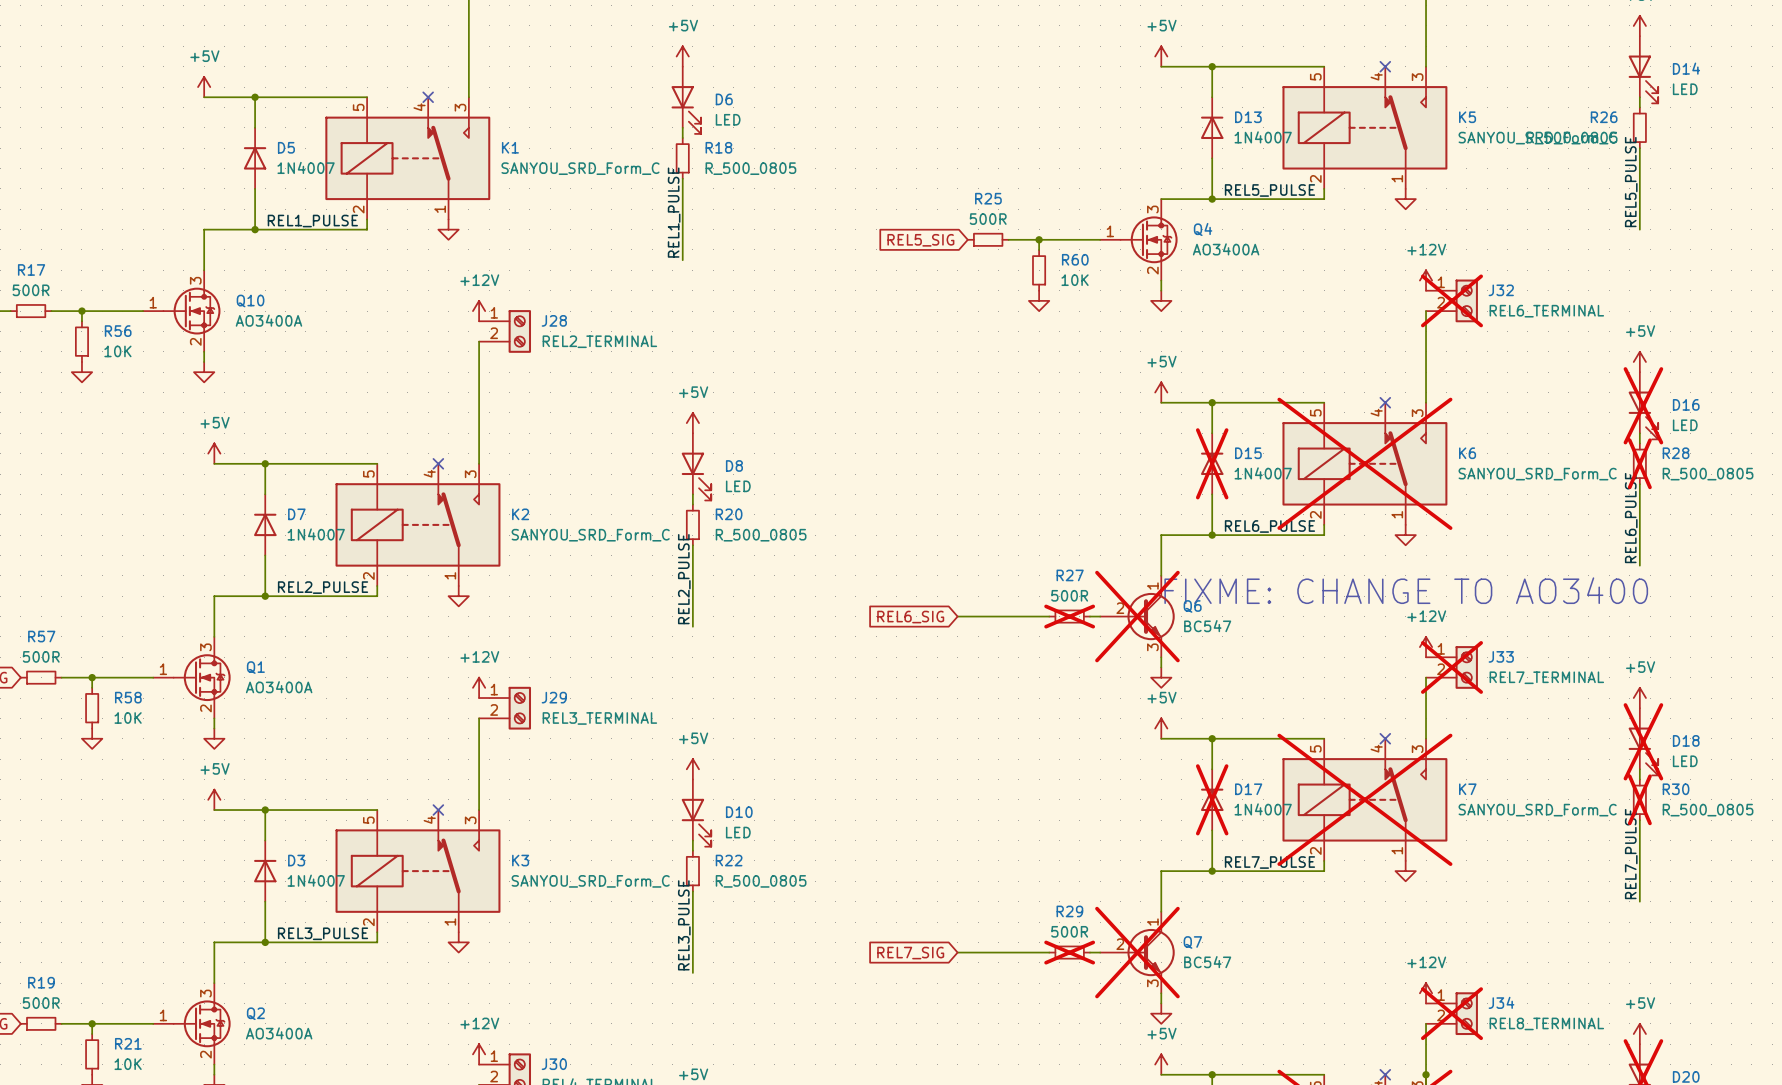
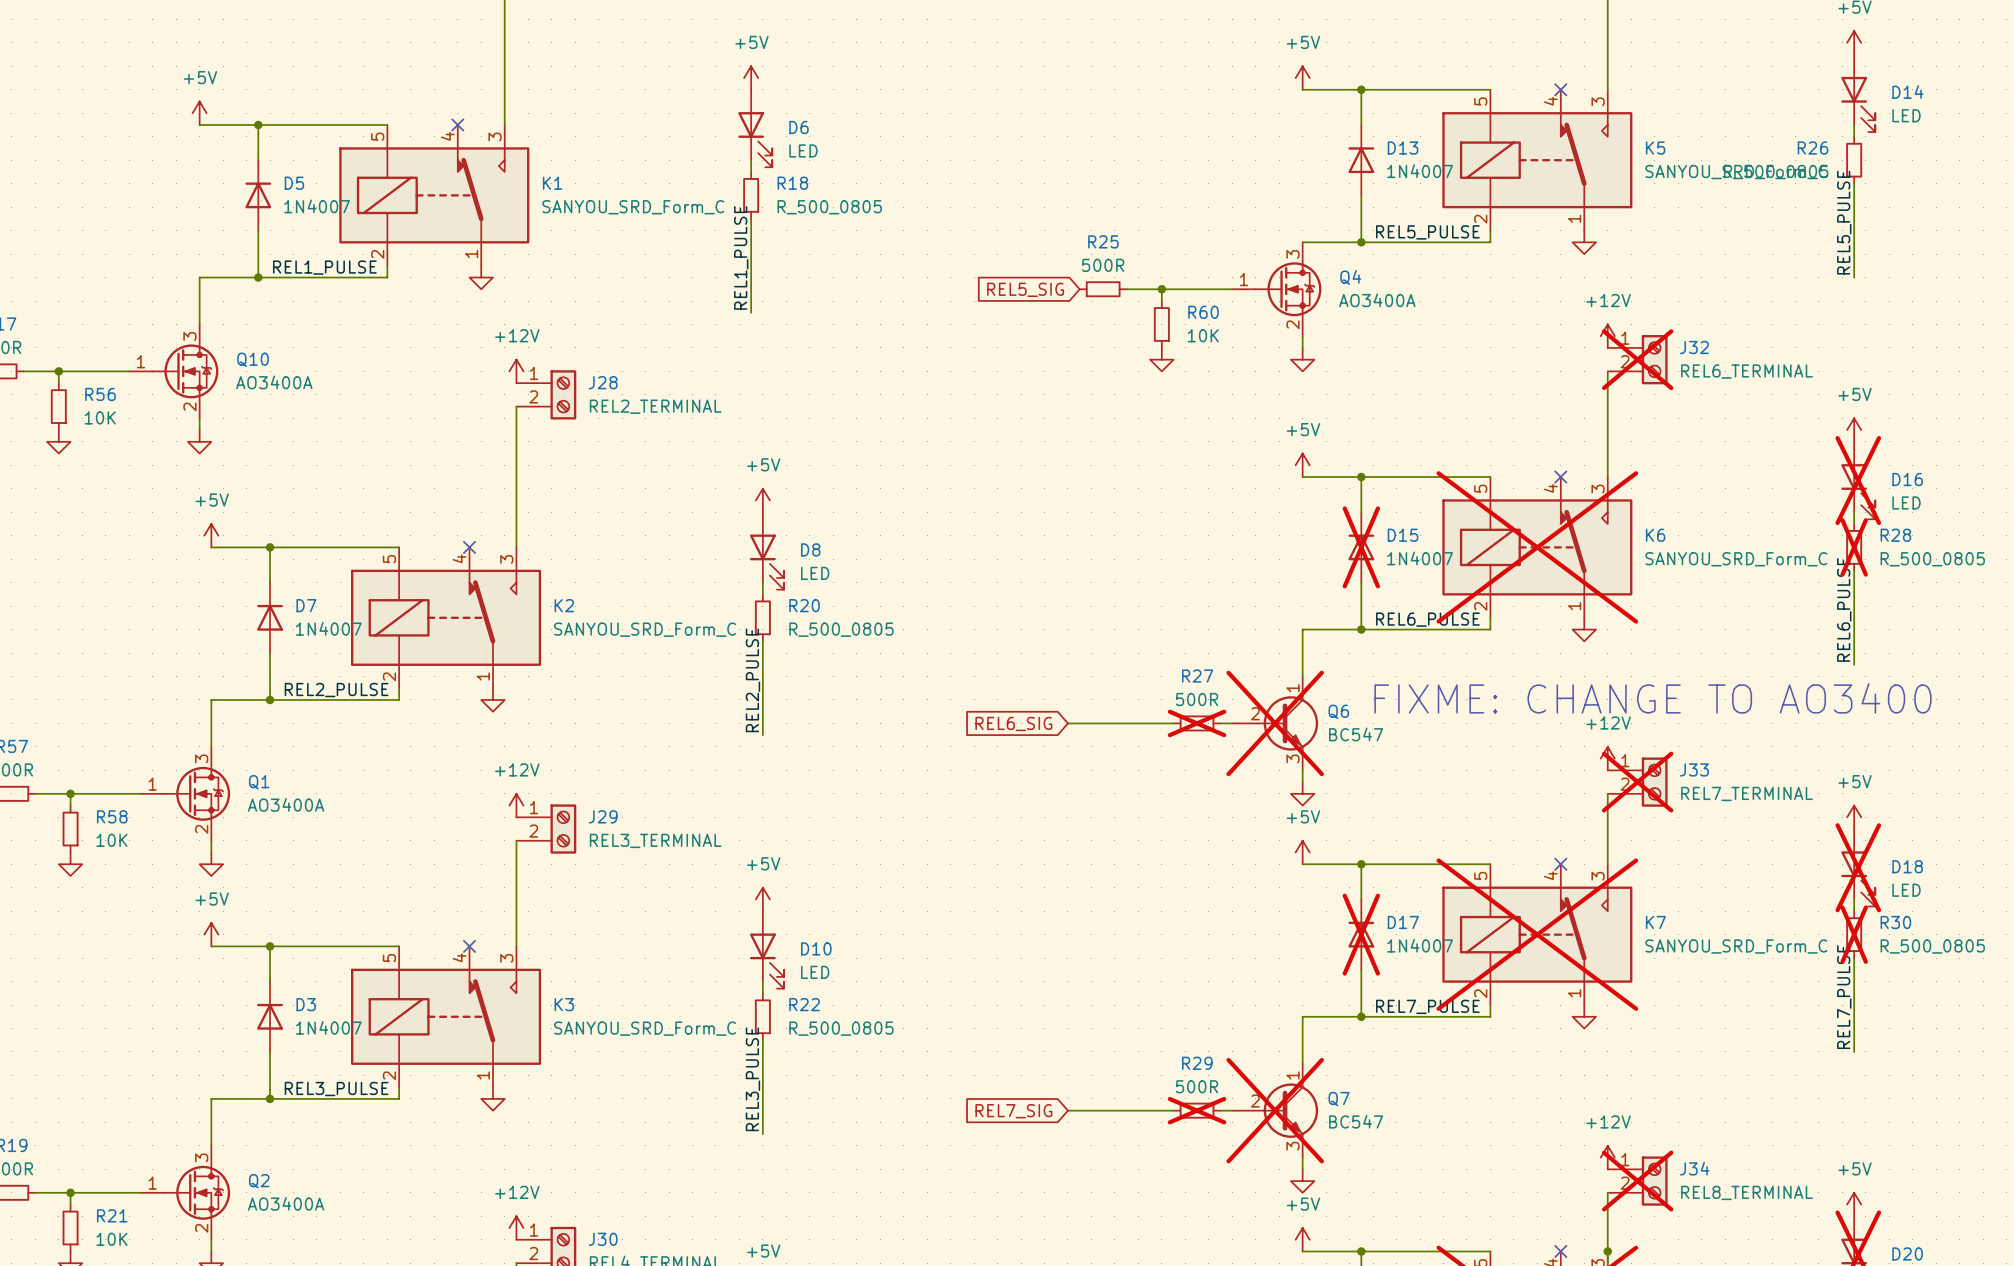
text position: FIXME: CHANGE TO AO3400 (1406, 590) -> FIXME: CHANGE TO AO3400 (1653, 698)

